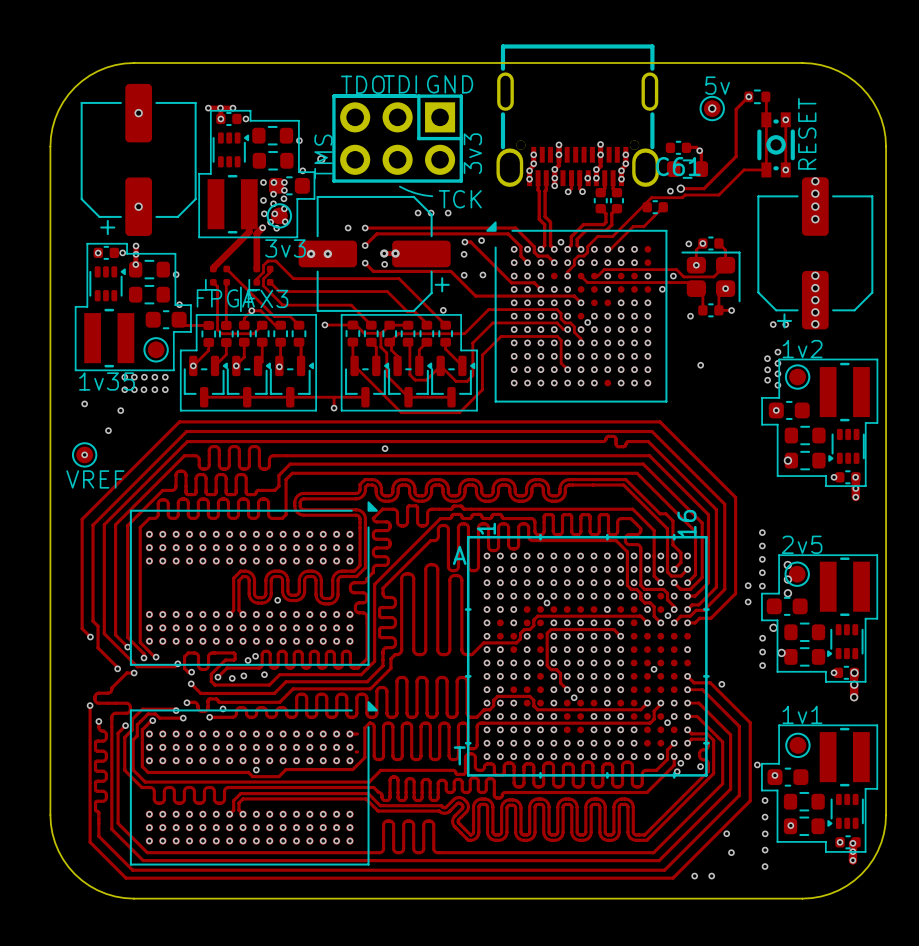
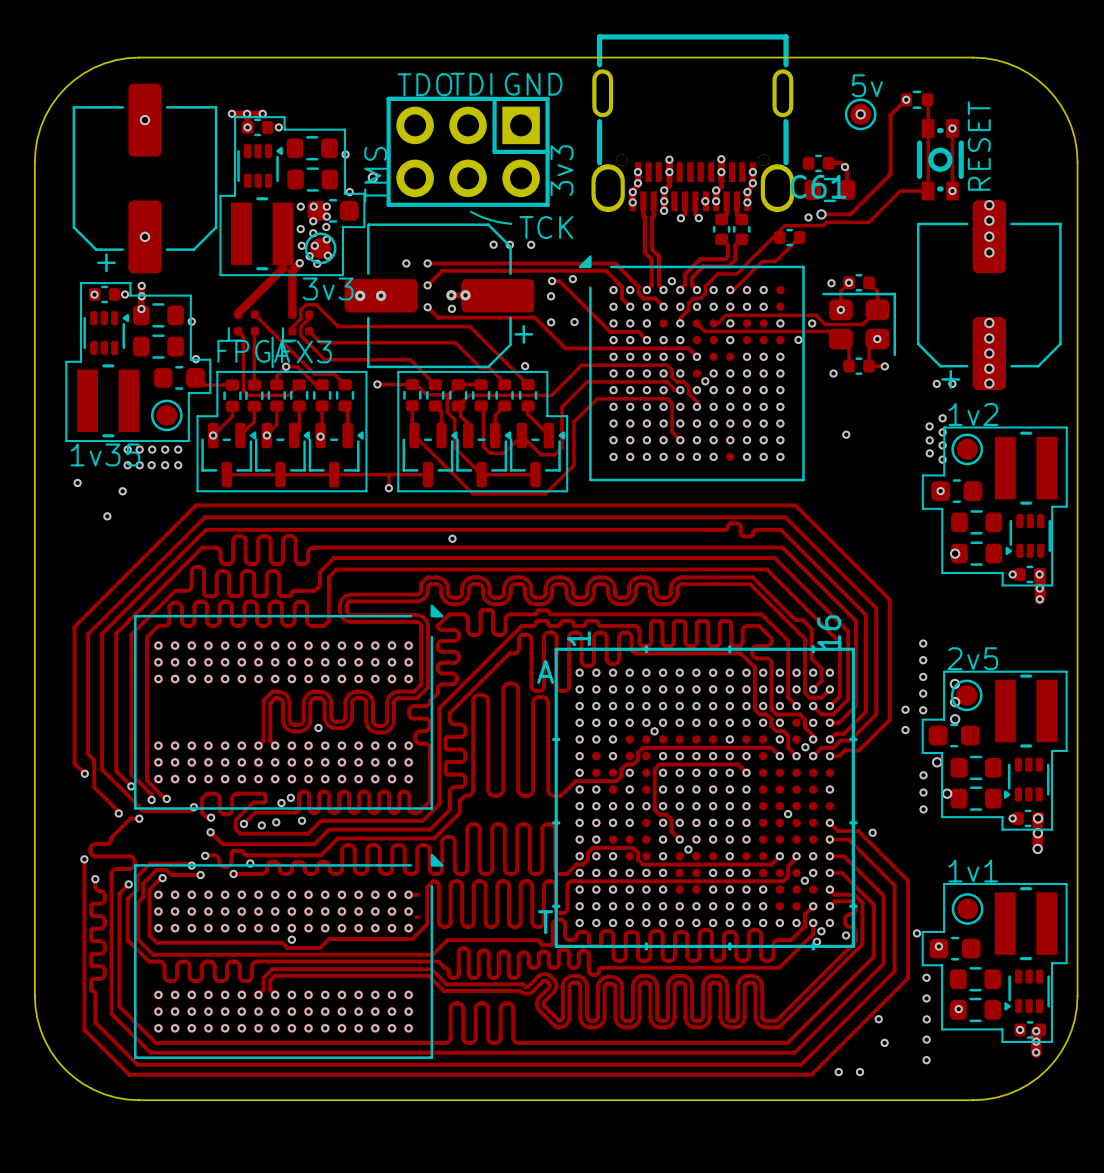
part: (84, 454) -> none
via: (84, 454) -> none
text: VREF (95, 479) -> none

